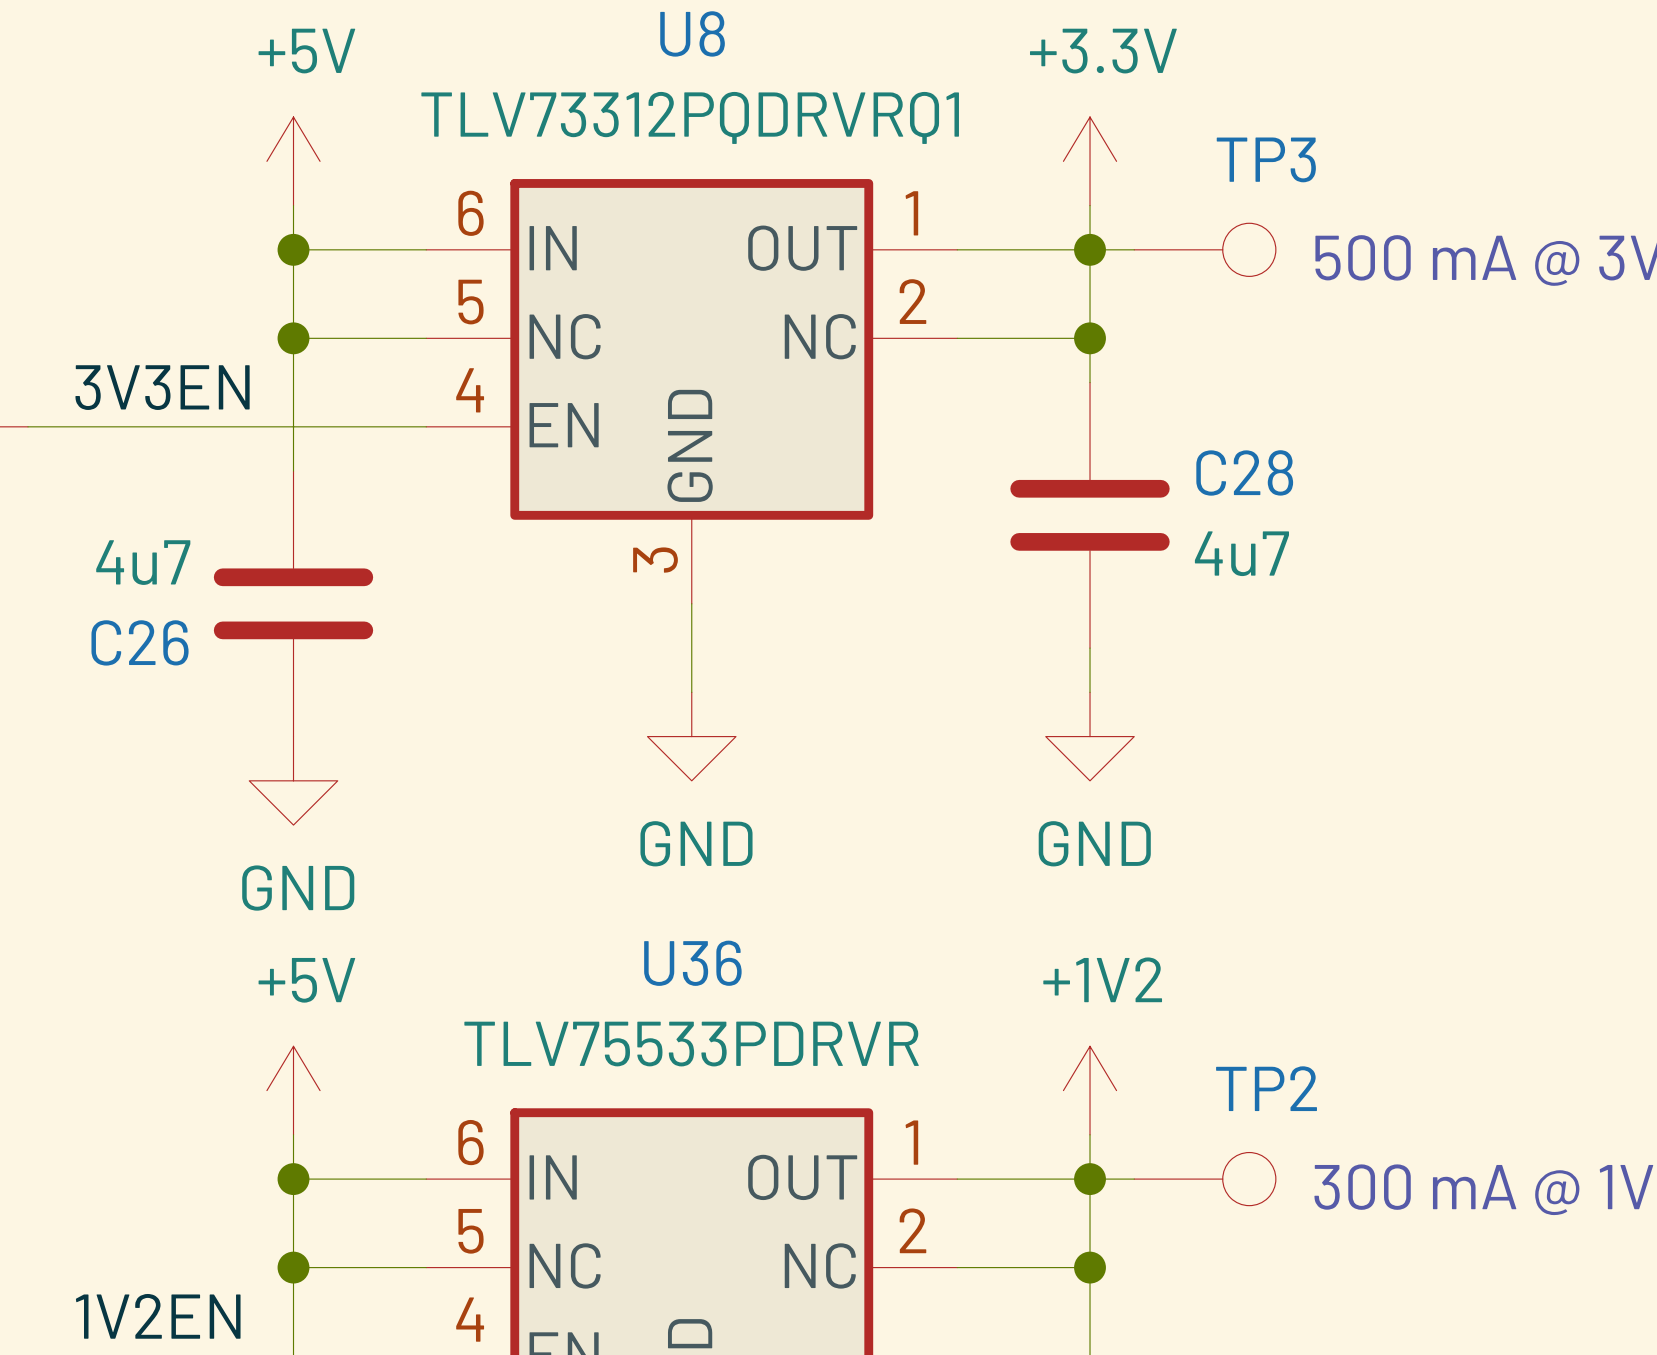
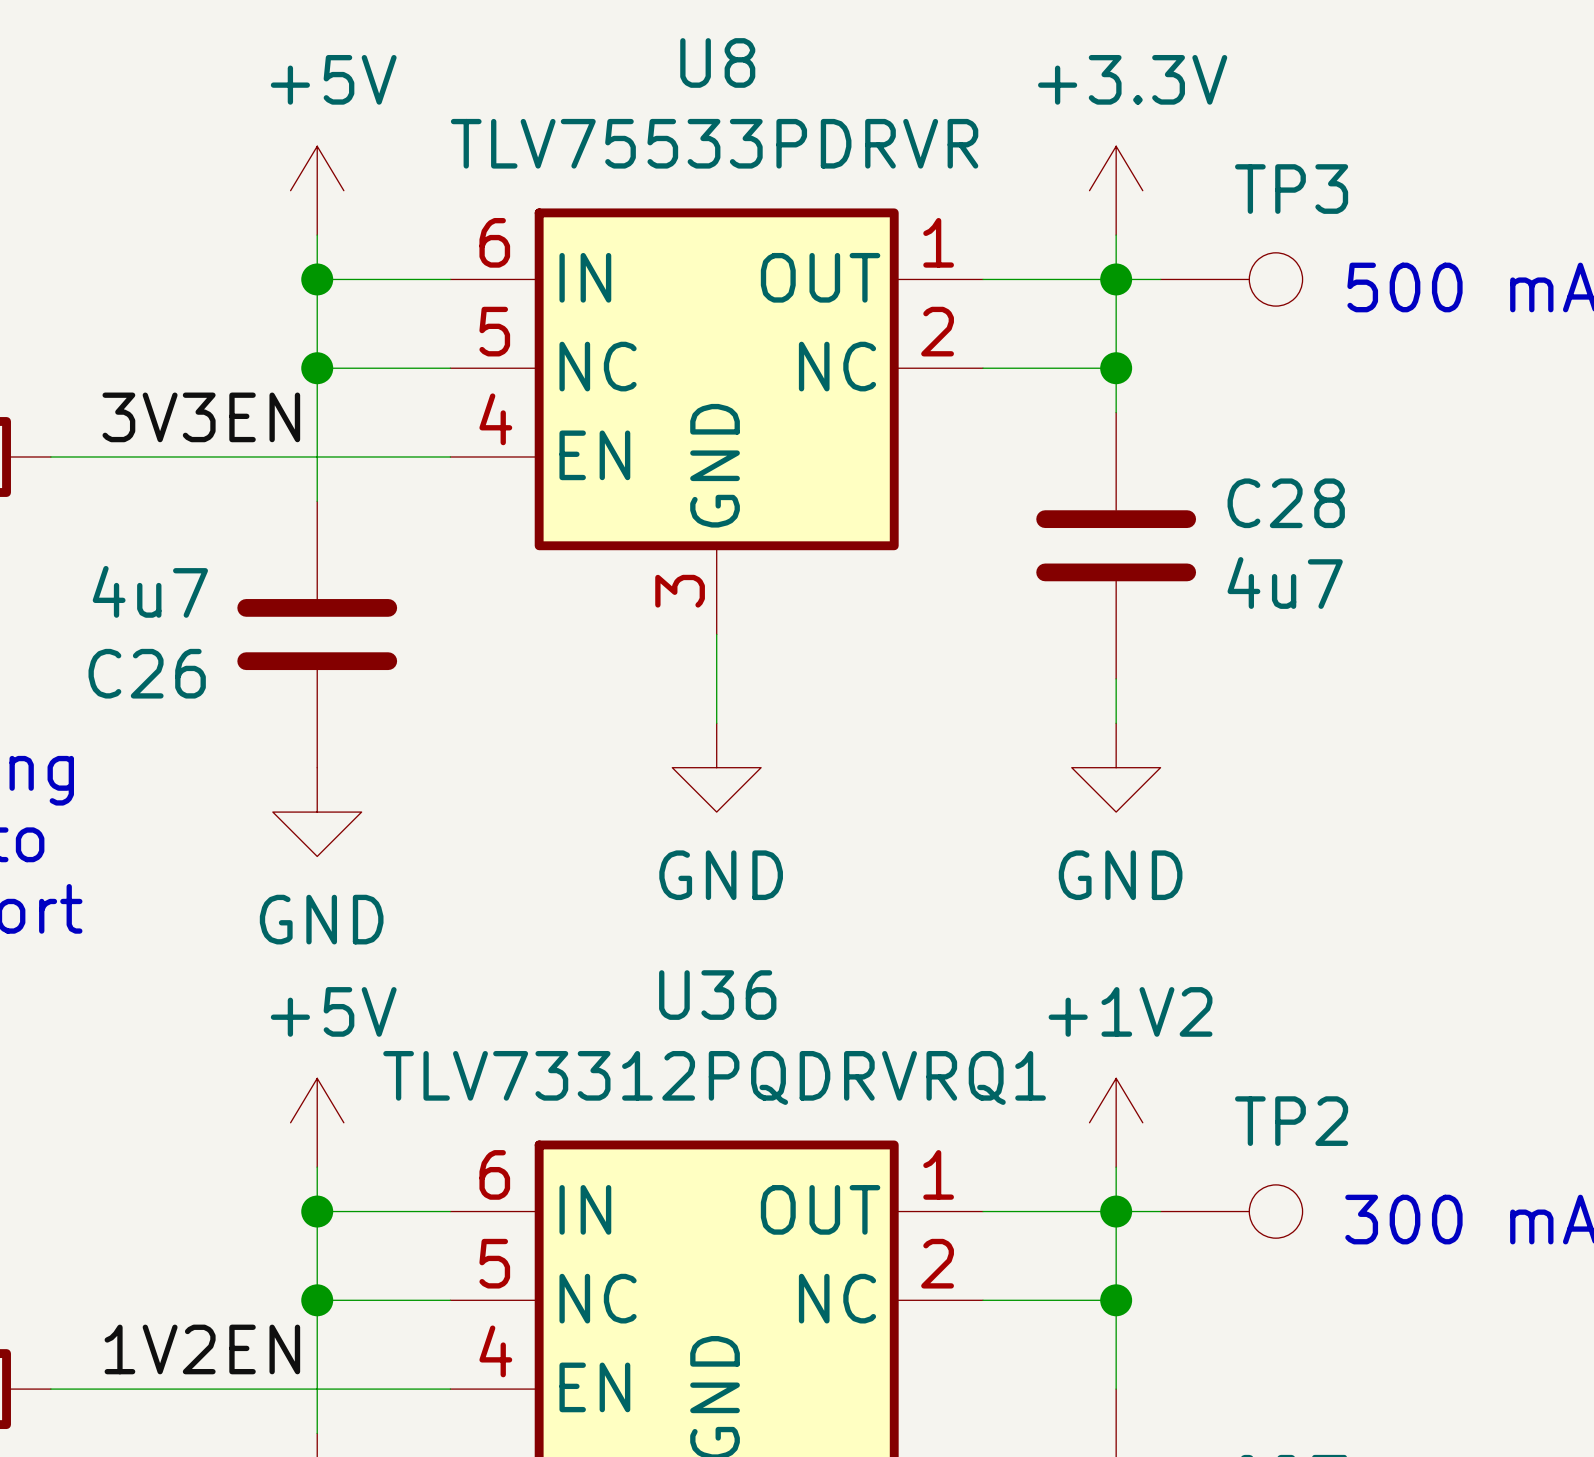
U8 value: TLV73312PQDRVRQ1 (690, 117) -> TLV75533PDRVR (714, 143)
U36 value: TLV75533PDRVR (691, 1044) -> TLV73312PQDRVRQ1 (714, 1077)

